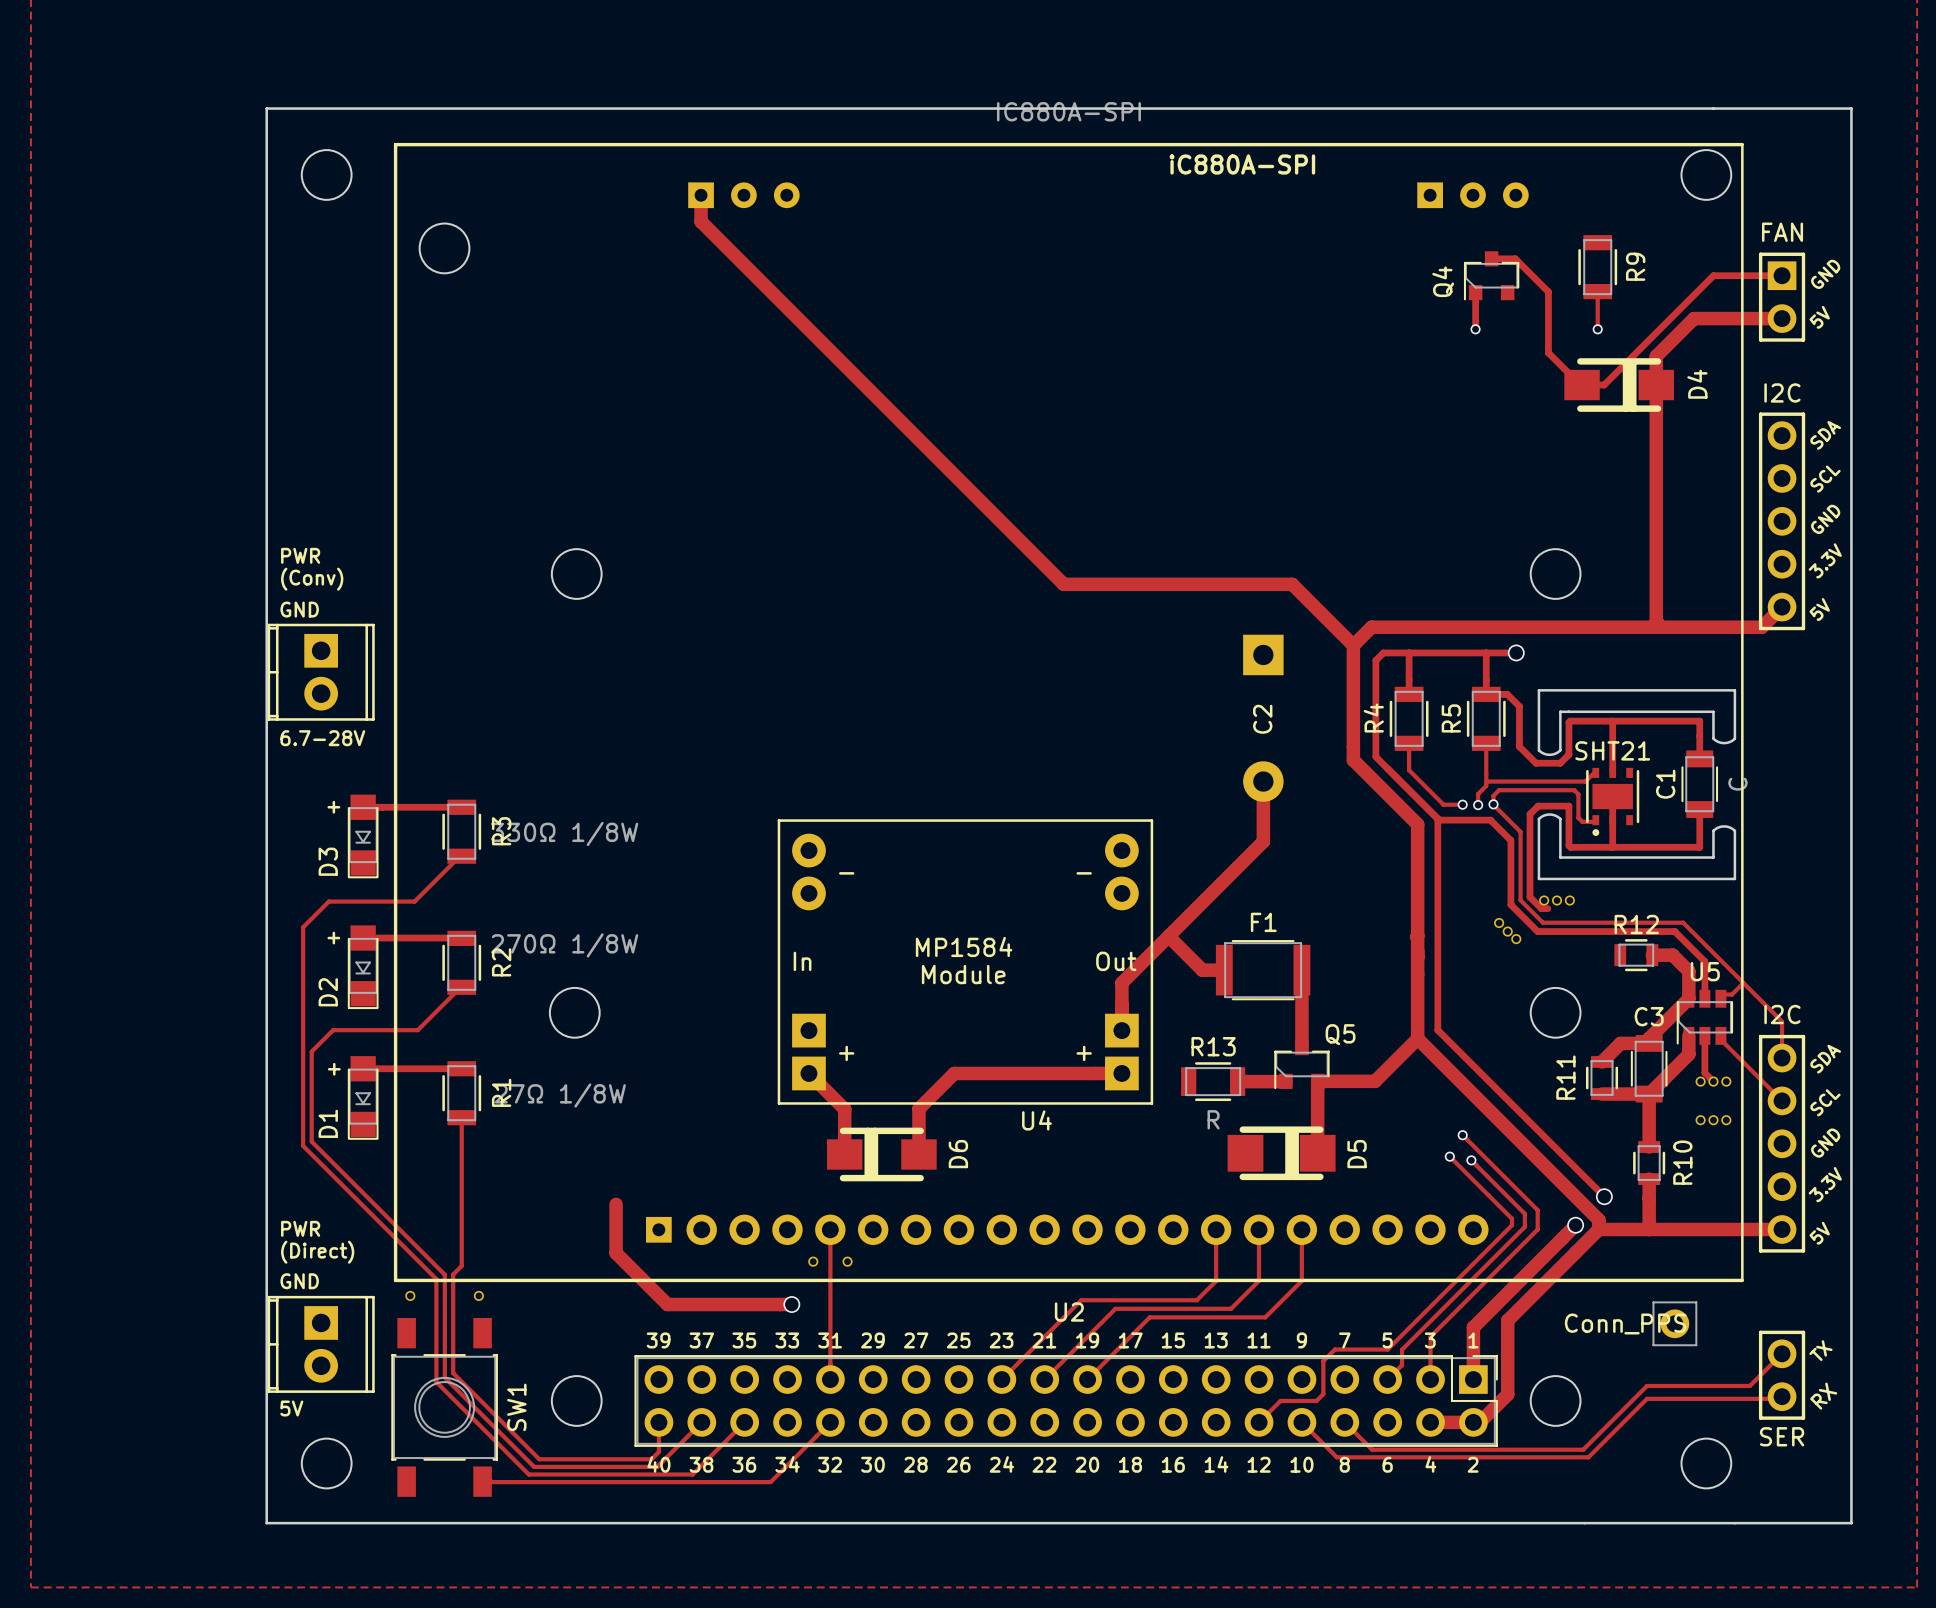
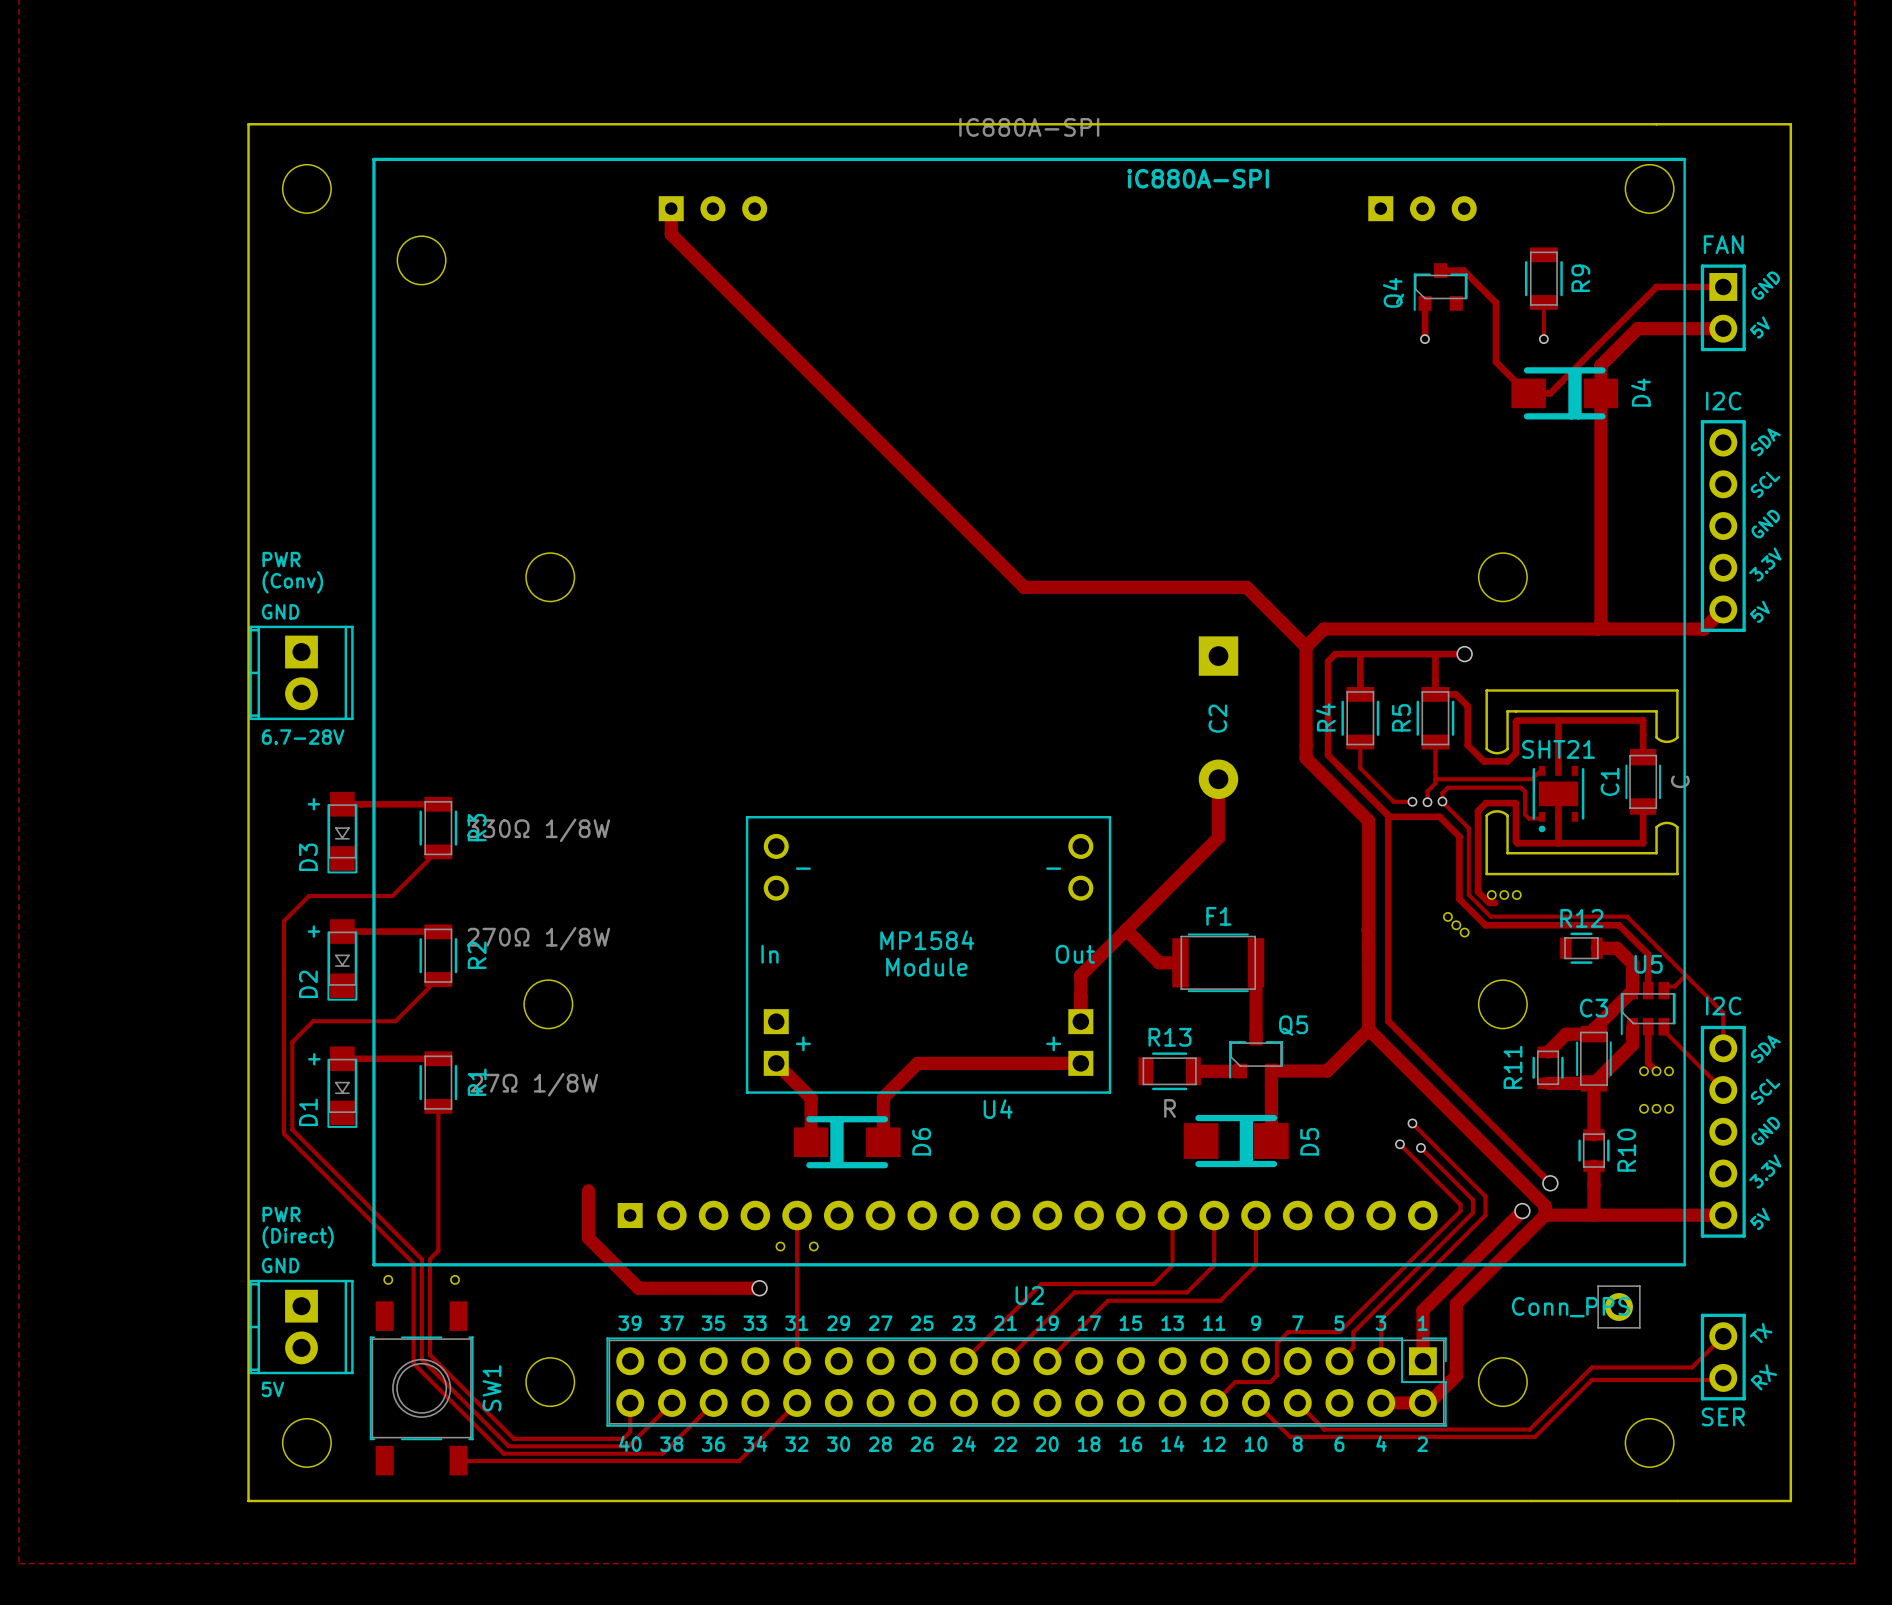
U4 footprint: [777, 819, 1154, 1105] -> [745, 815, 1112, 1094]

